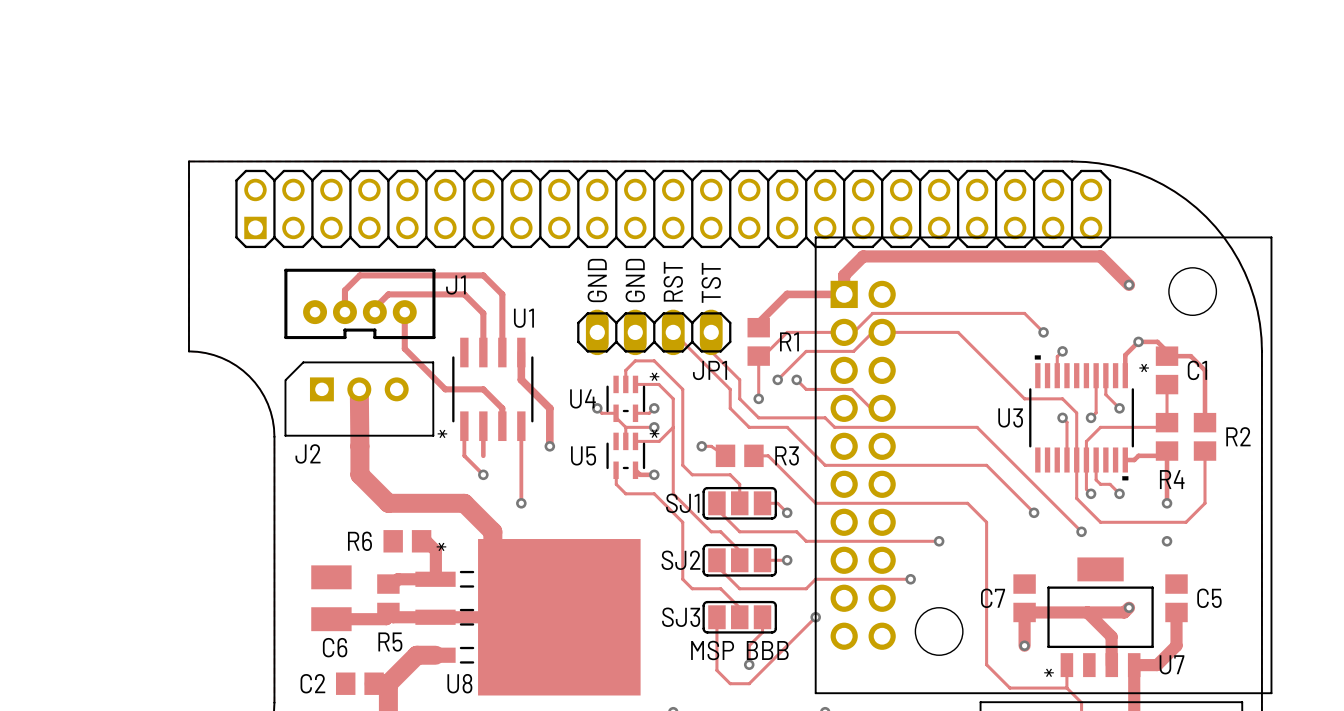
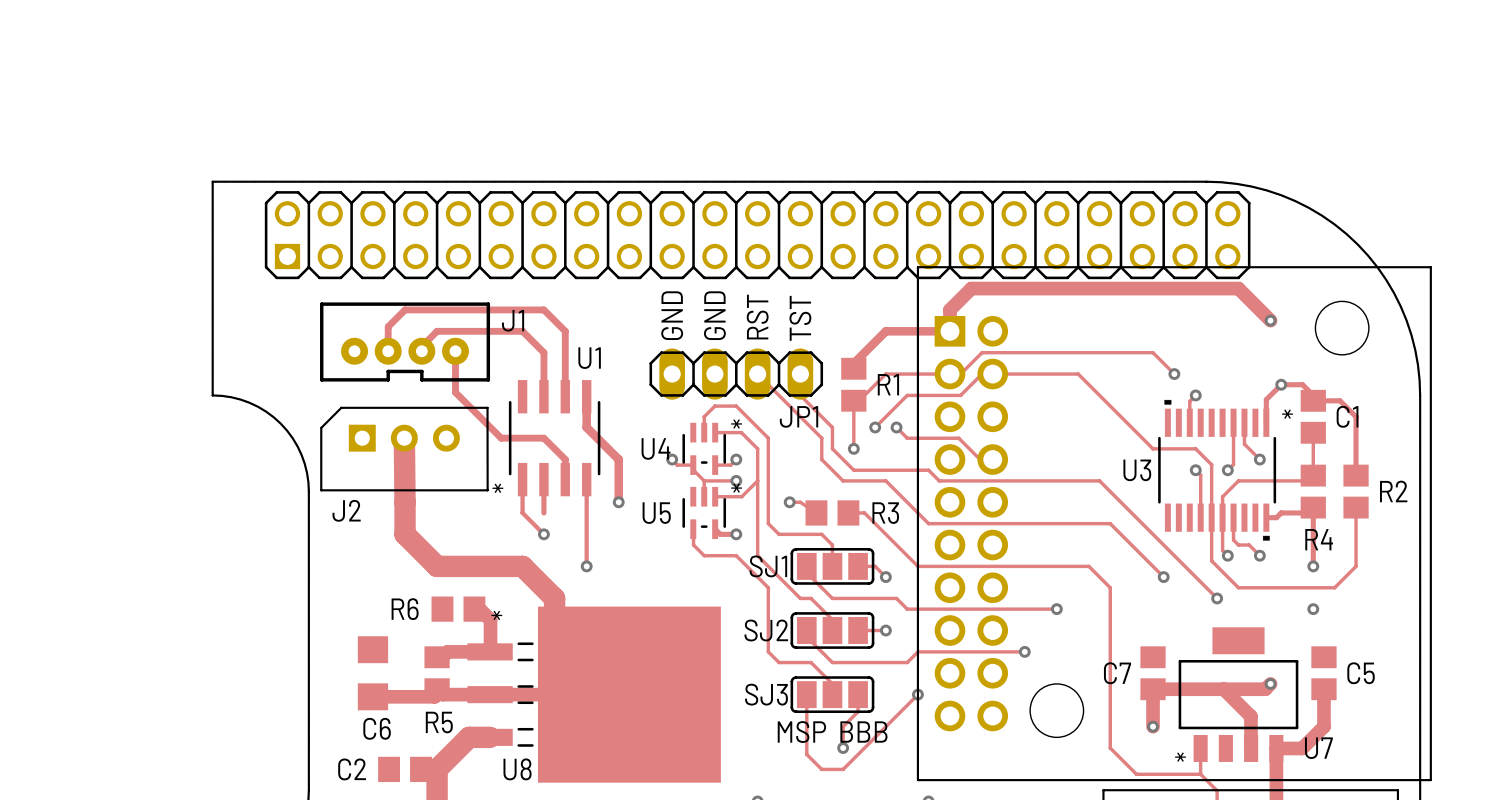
C6 footprint: [311, 565, 352, 632] -> [357, 636, 389, 711]

